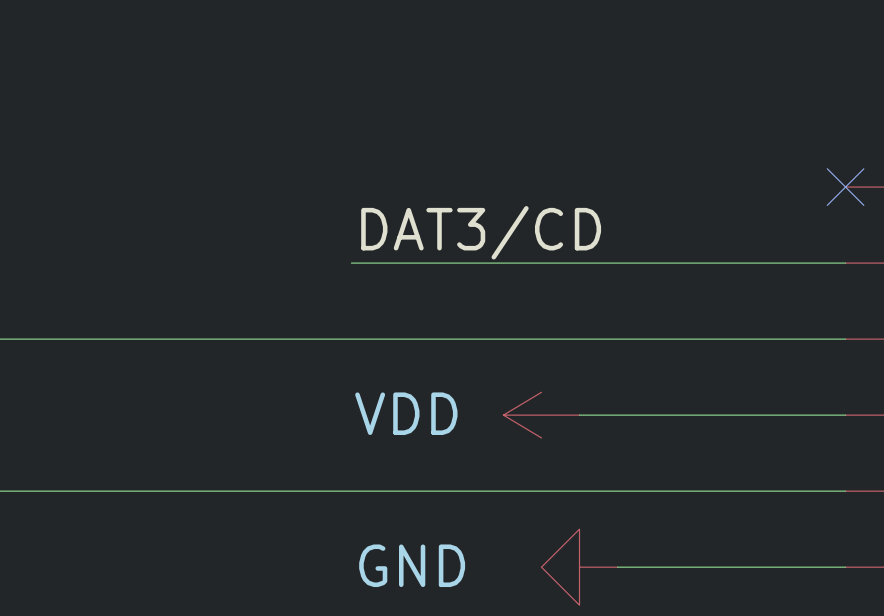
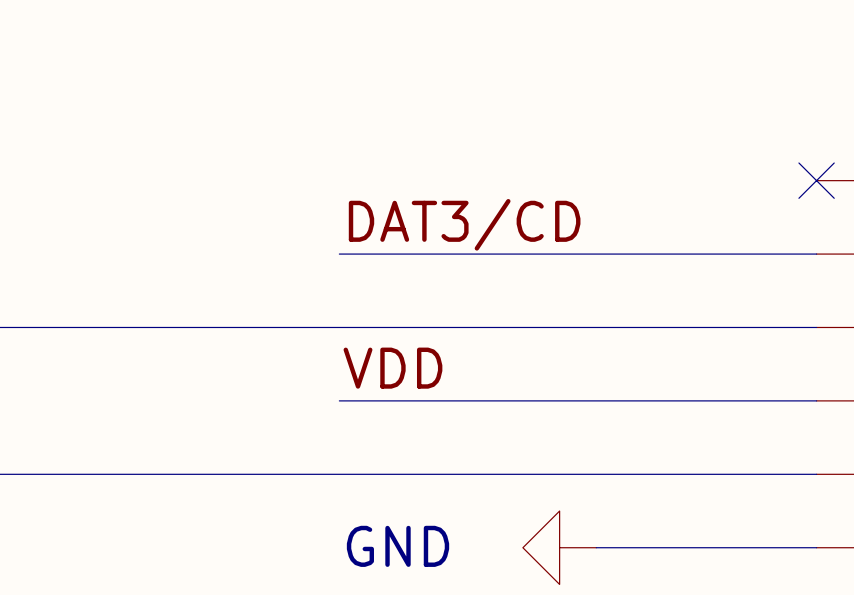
label: none -> VDD (392, 368)
wire: none -> (339, 400) (559, 400)
power symbol: VDD (541, 415) -> none

